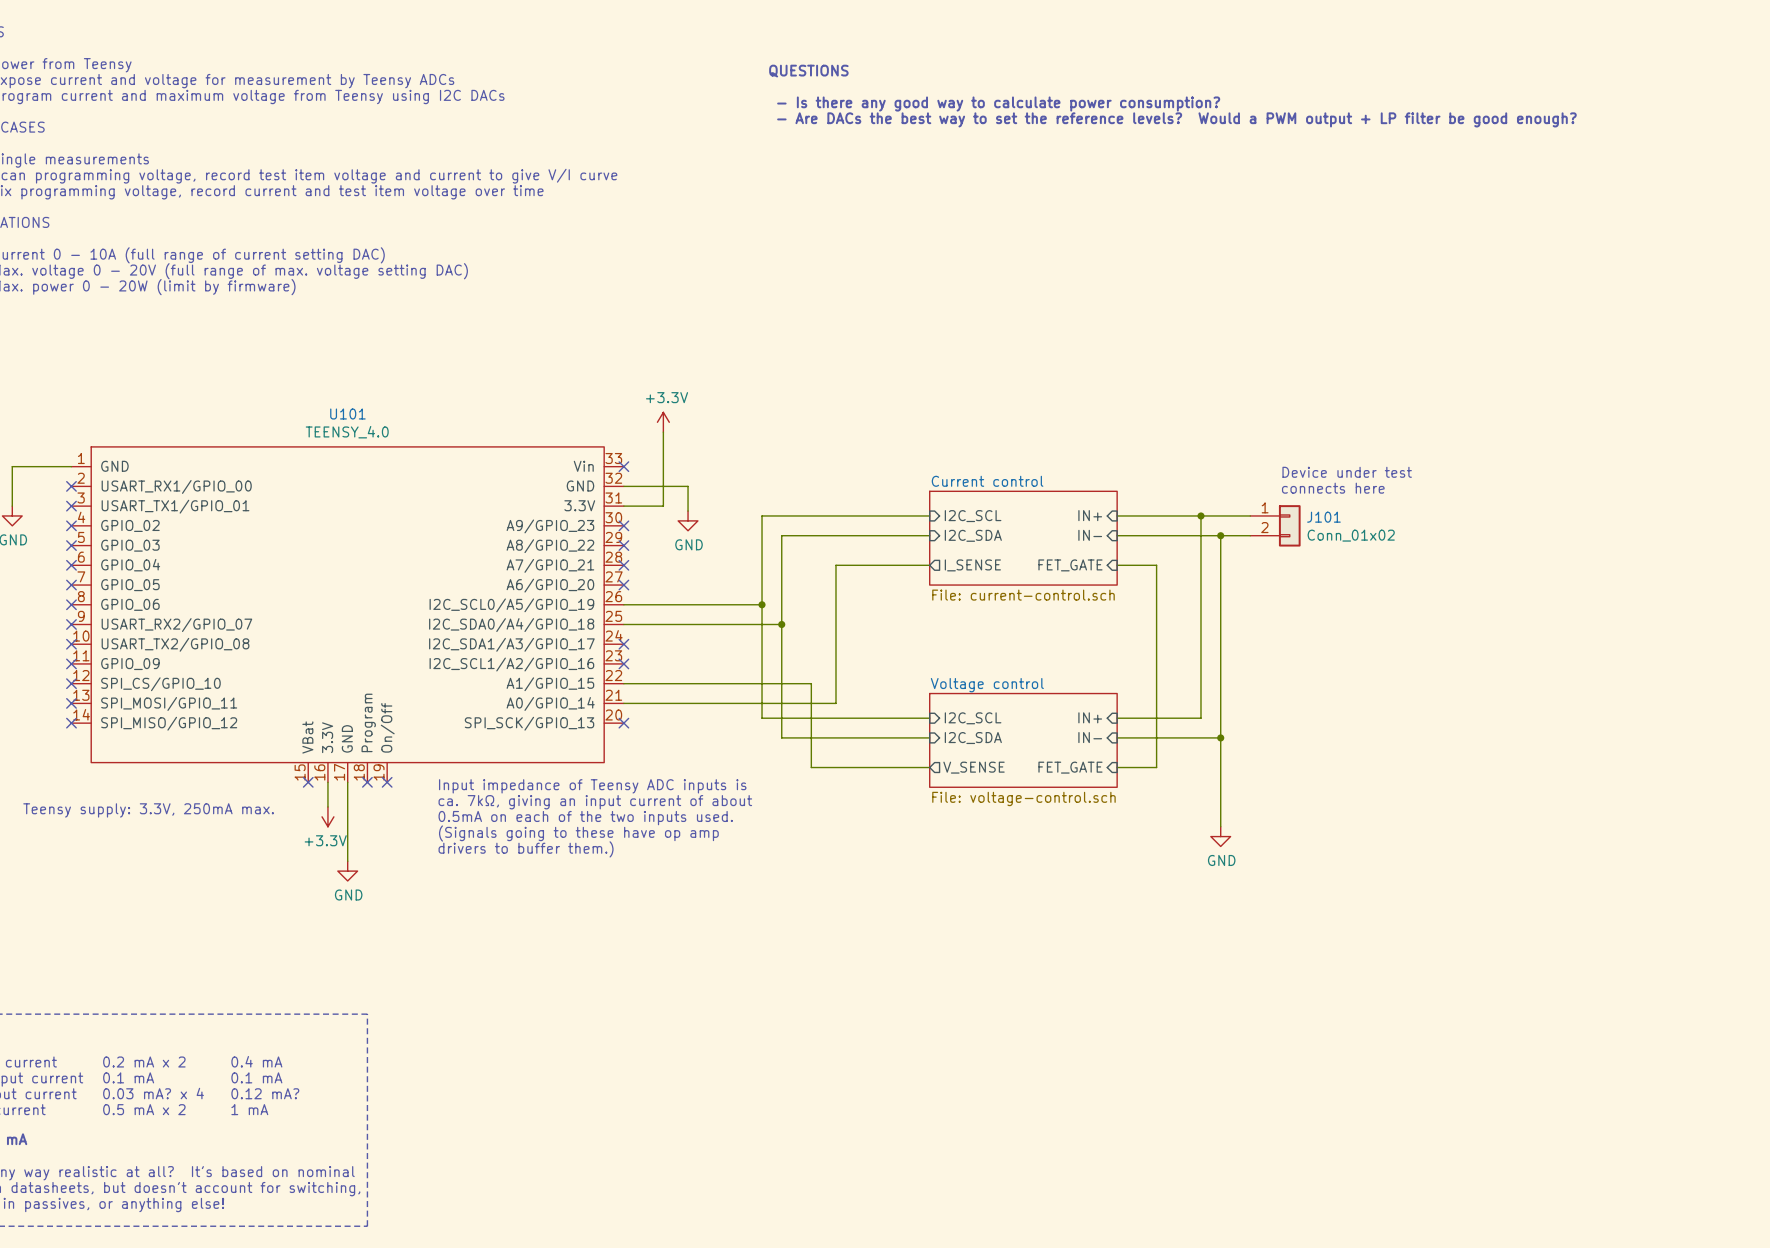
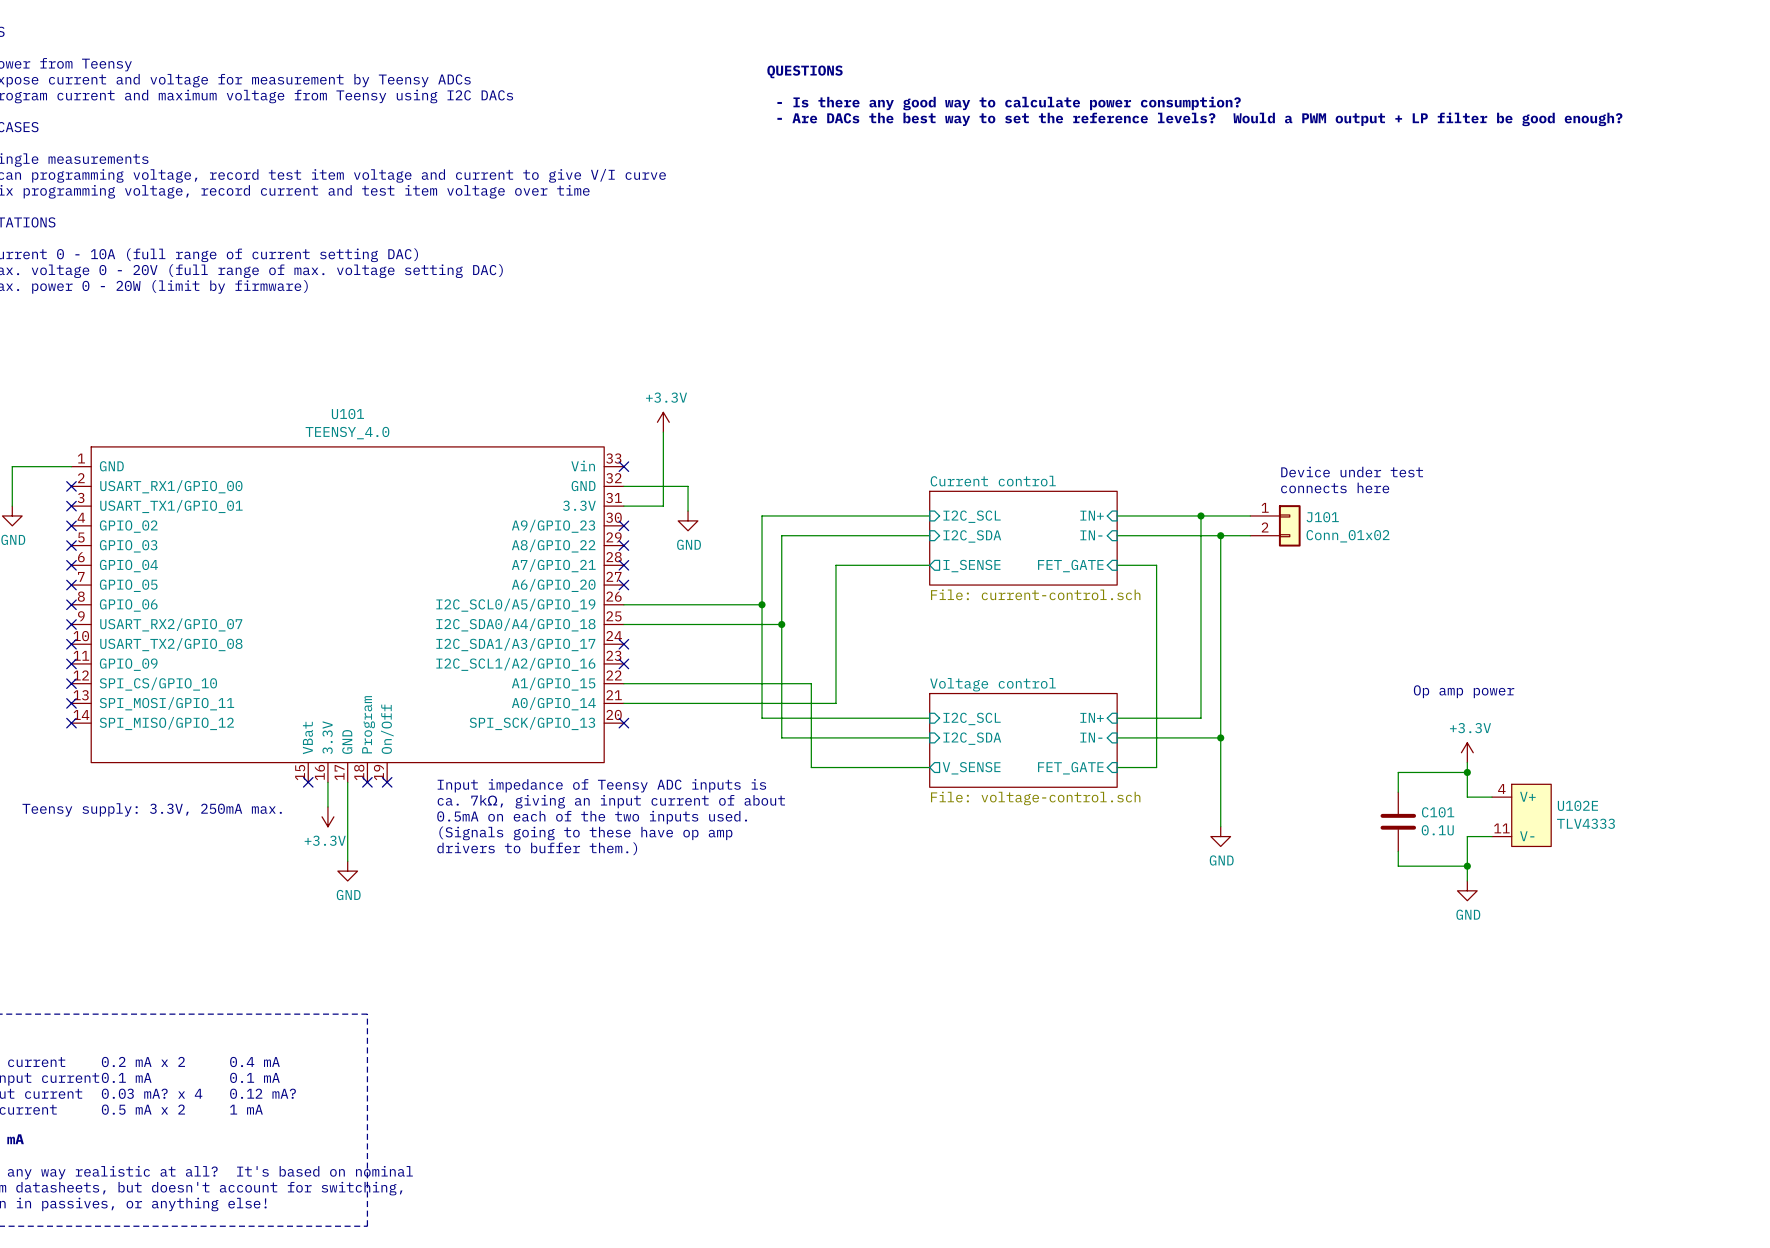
text: none -> Op amp power (1464, 691)
power symbol: none -> +3.3V (1467, 752)
wire: none -> (1467, 762) (1467, 797) (1491, 797)
wire: none -> (1467, 772) (1398, 772) (1398, 792)
junction: none -> (1467, 772)
U102E: none -> TLV4333 (1521, 815)
C101: none -> 0.1U (1398, 821)
wire: none -> (1491, 836) (1467, 836) (1467, 880)
wire: none -> (1398, 851) (1398, 866) (1467, 866)
junction: none -> (1467, 866)
power symbol: none -> GND (1467, 890)

